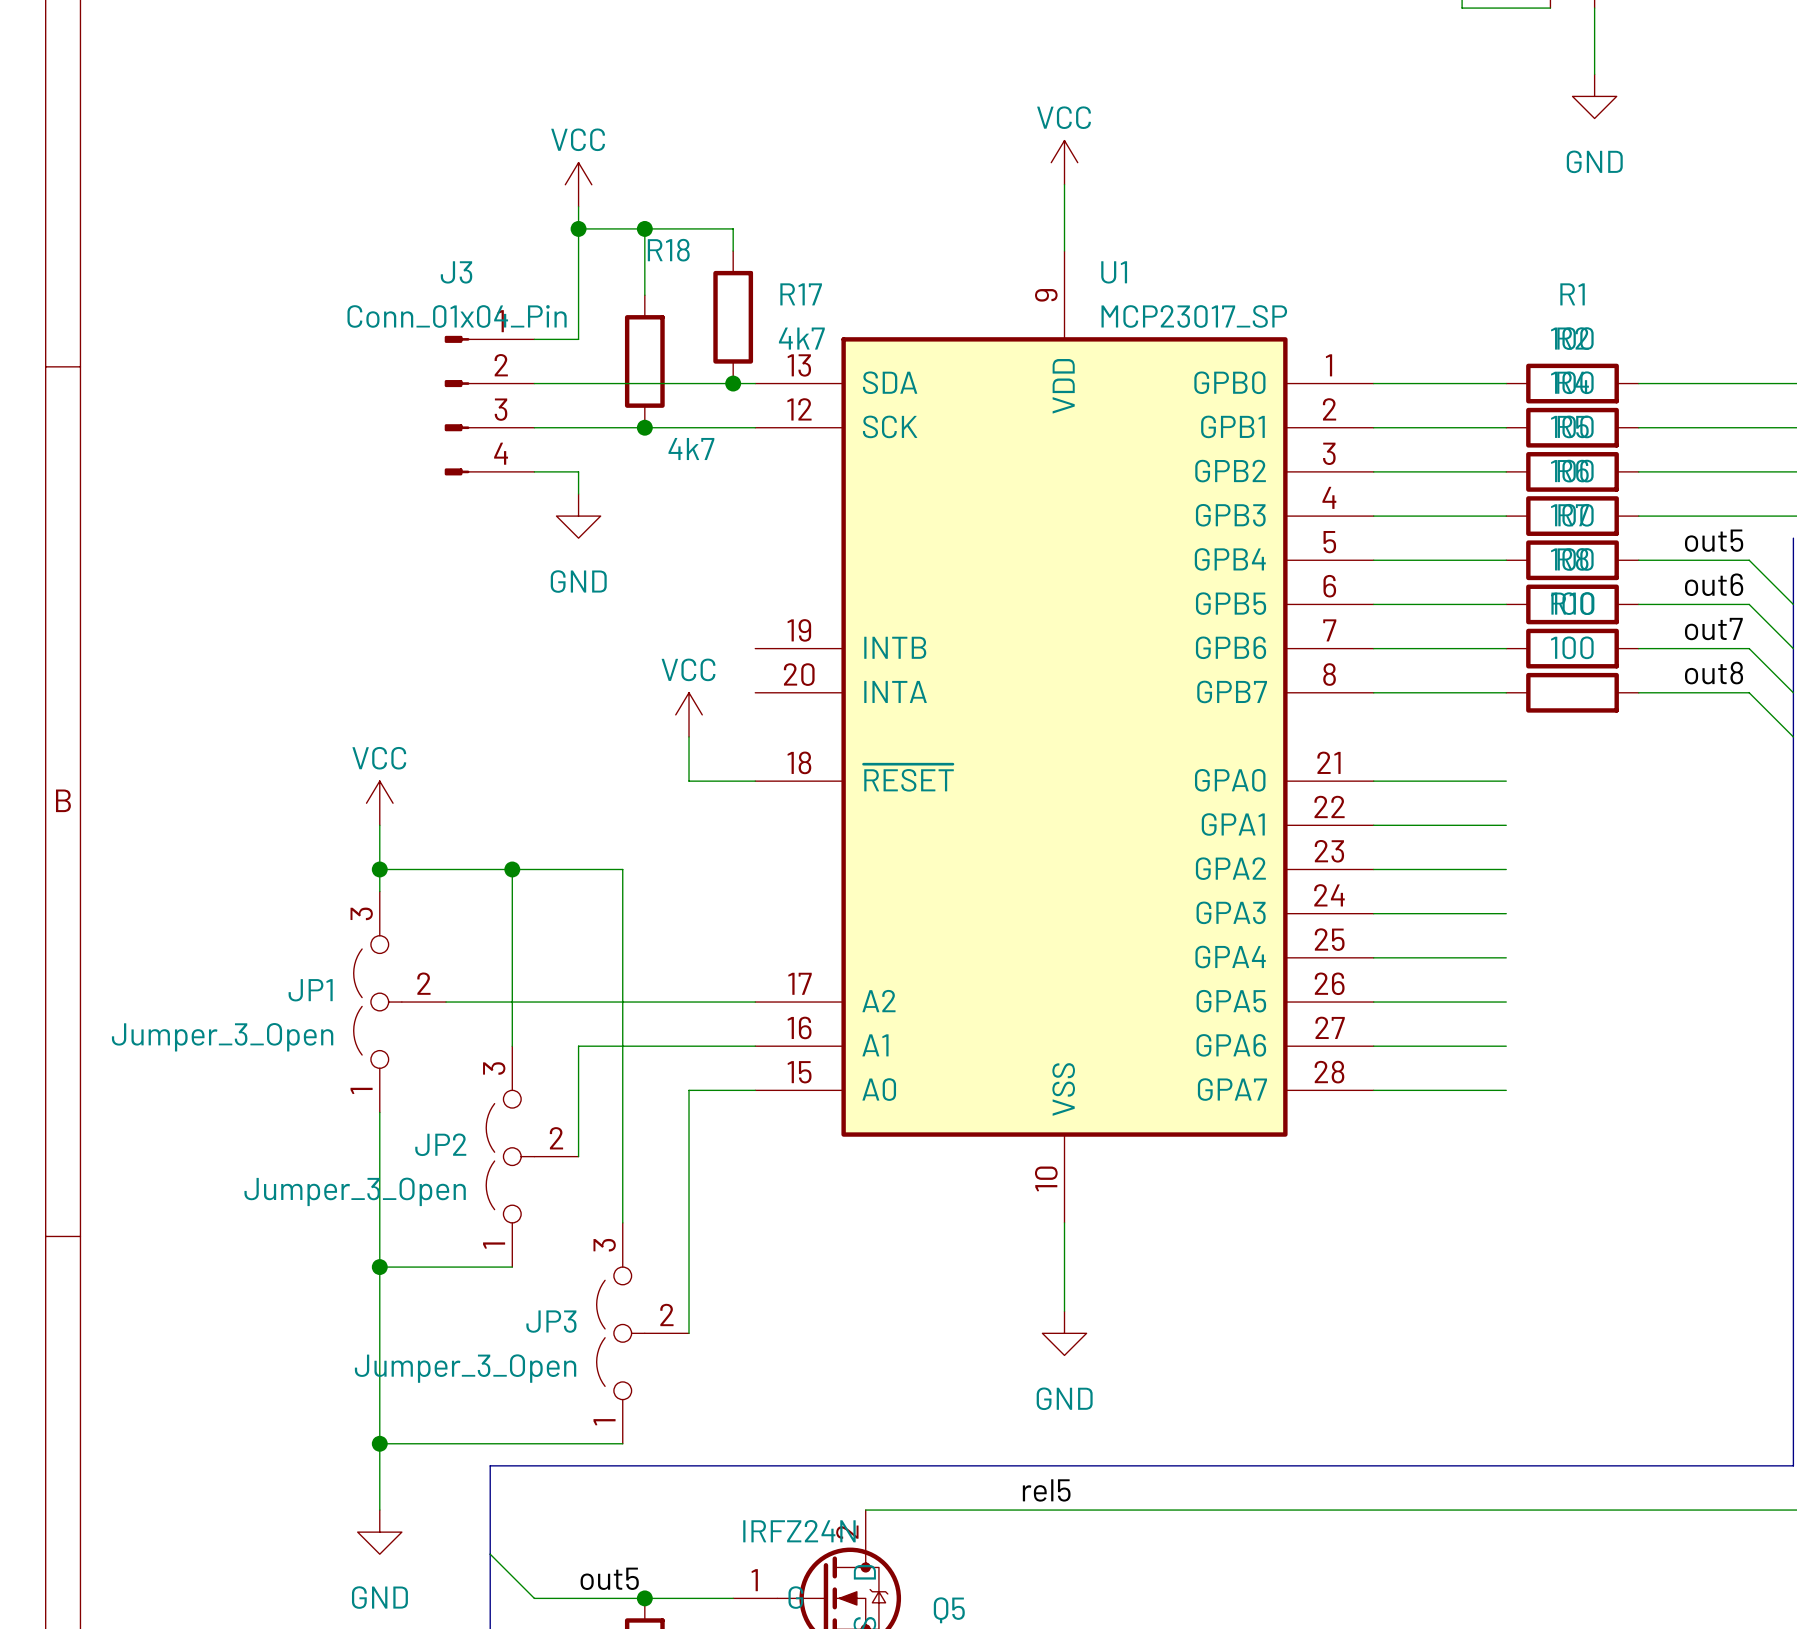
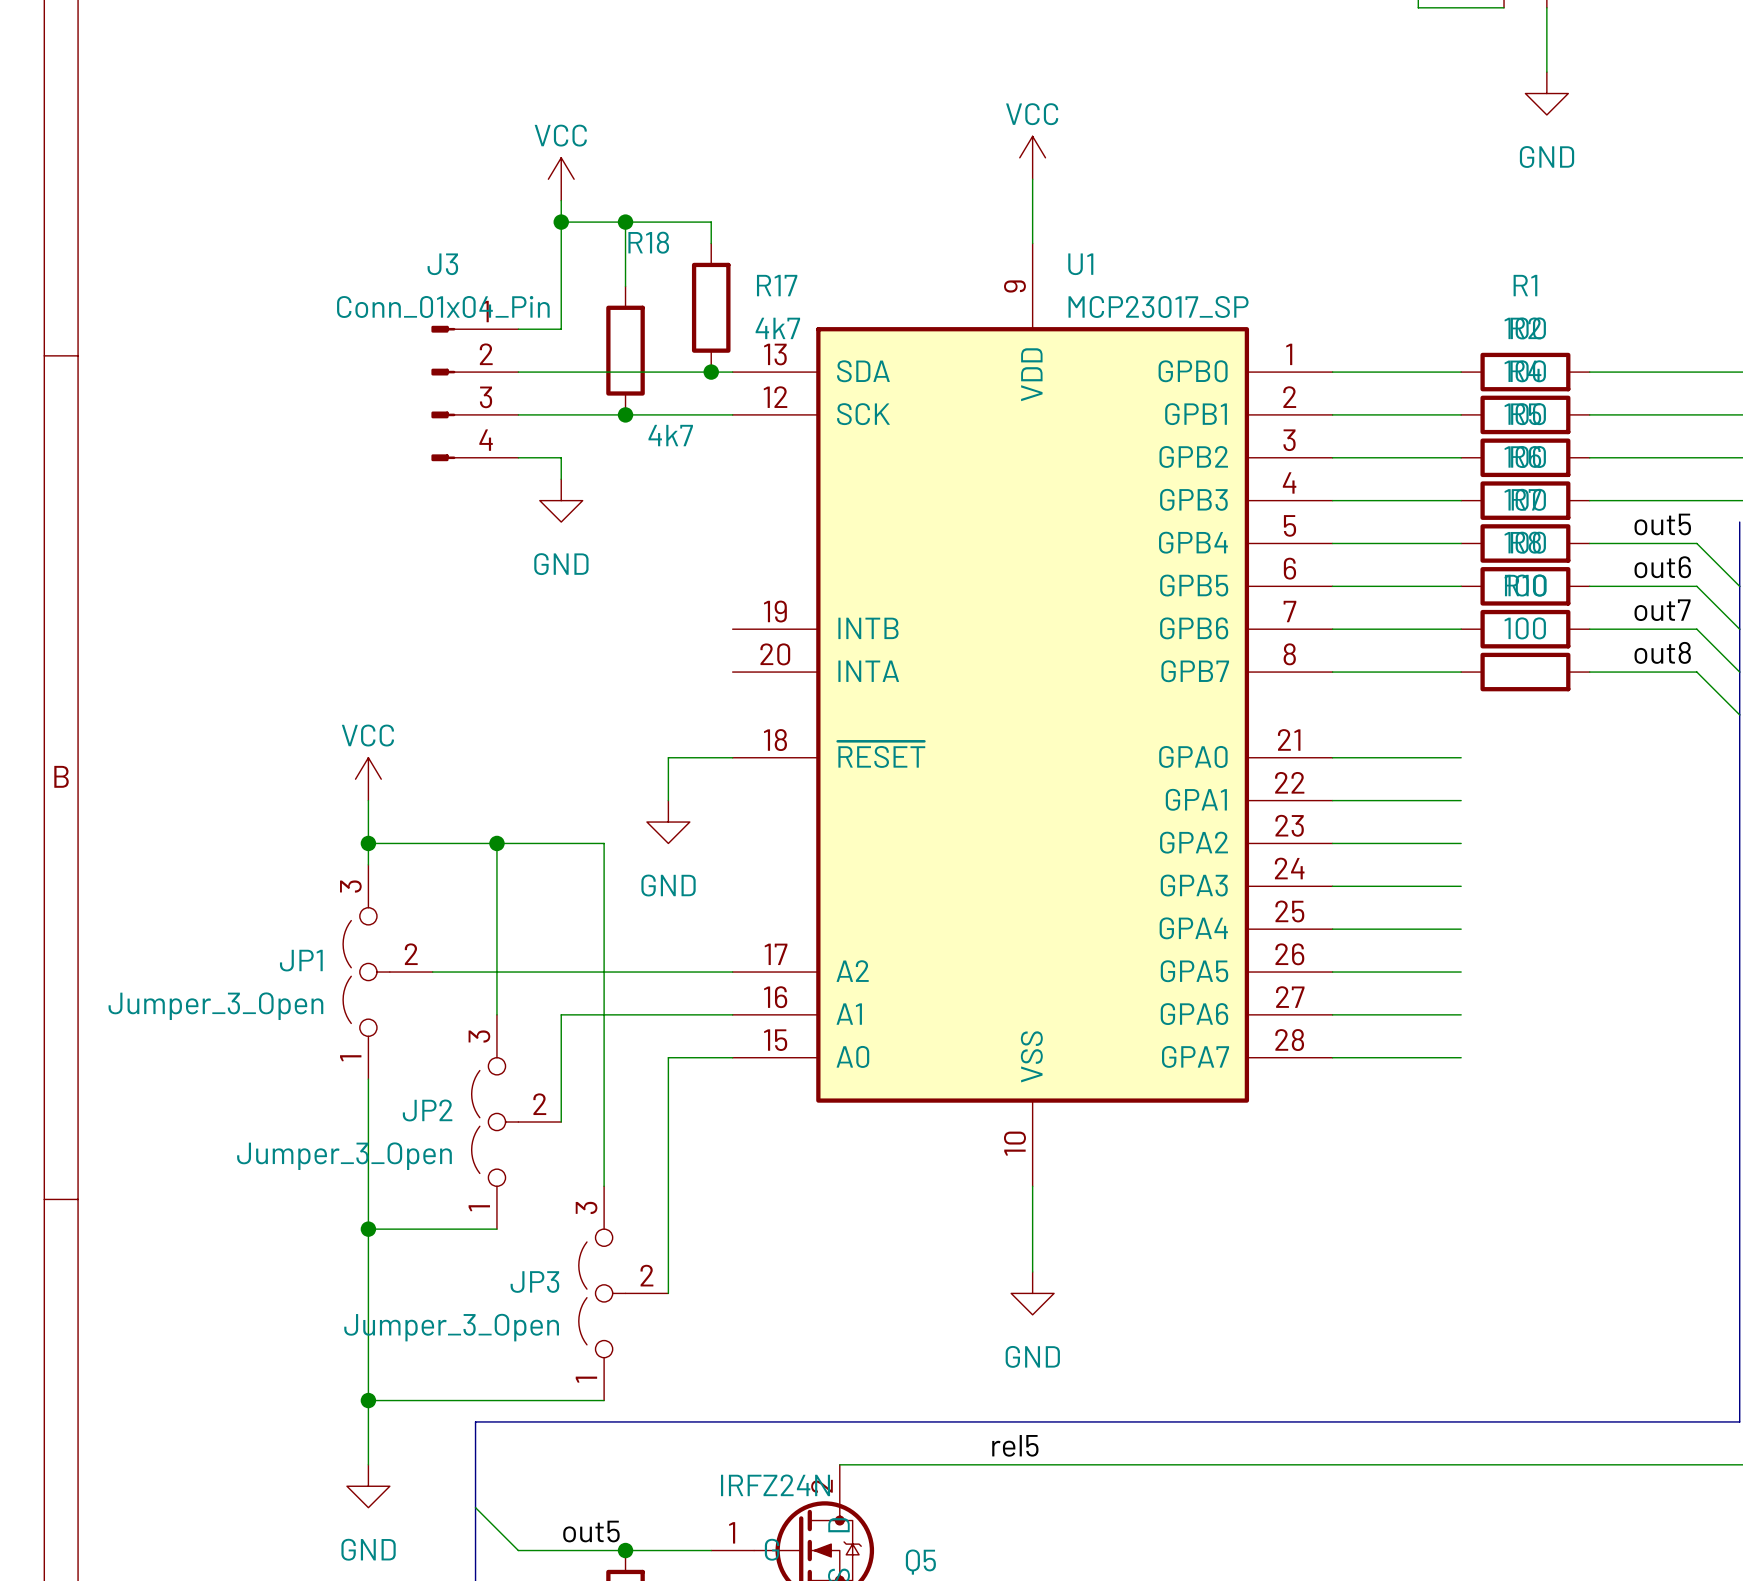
power symbol: VCC (689, 714) -> none
wire: (689, 736) (689, 781) -> (668, 800) (668, 757)
power symbol: none -> GND (668, 822)

